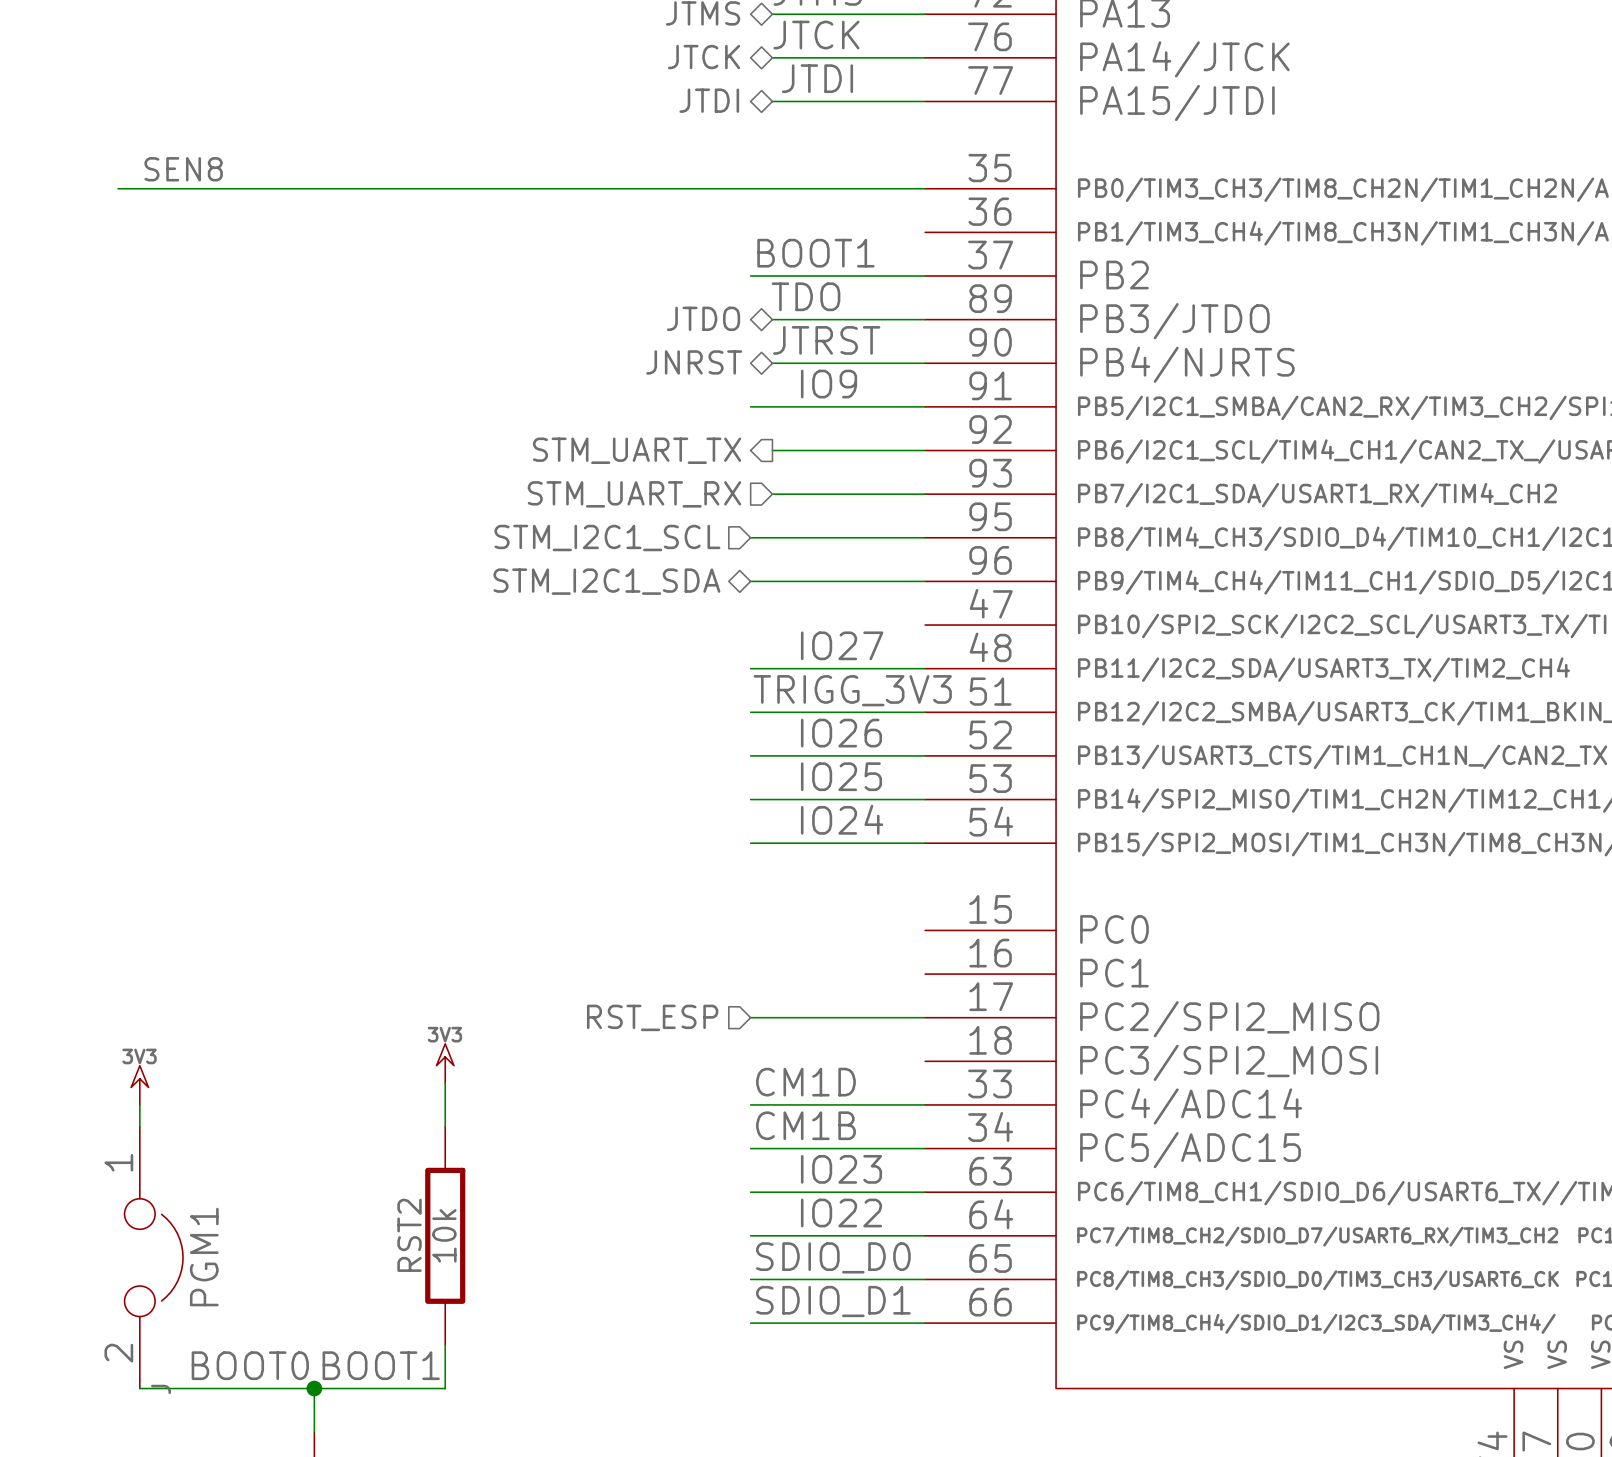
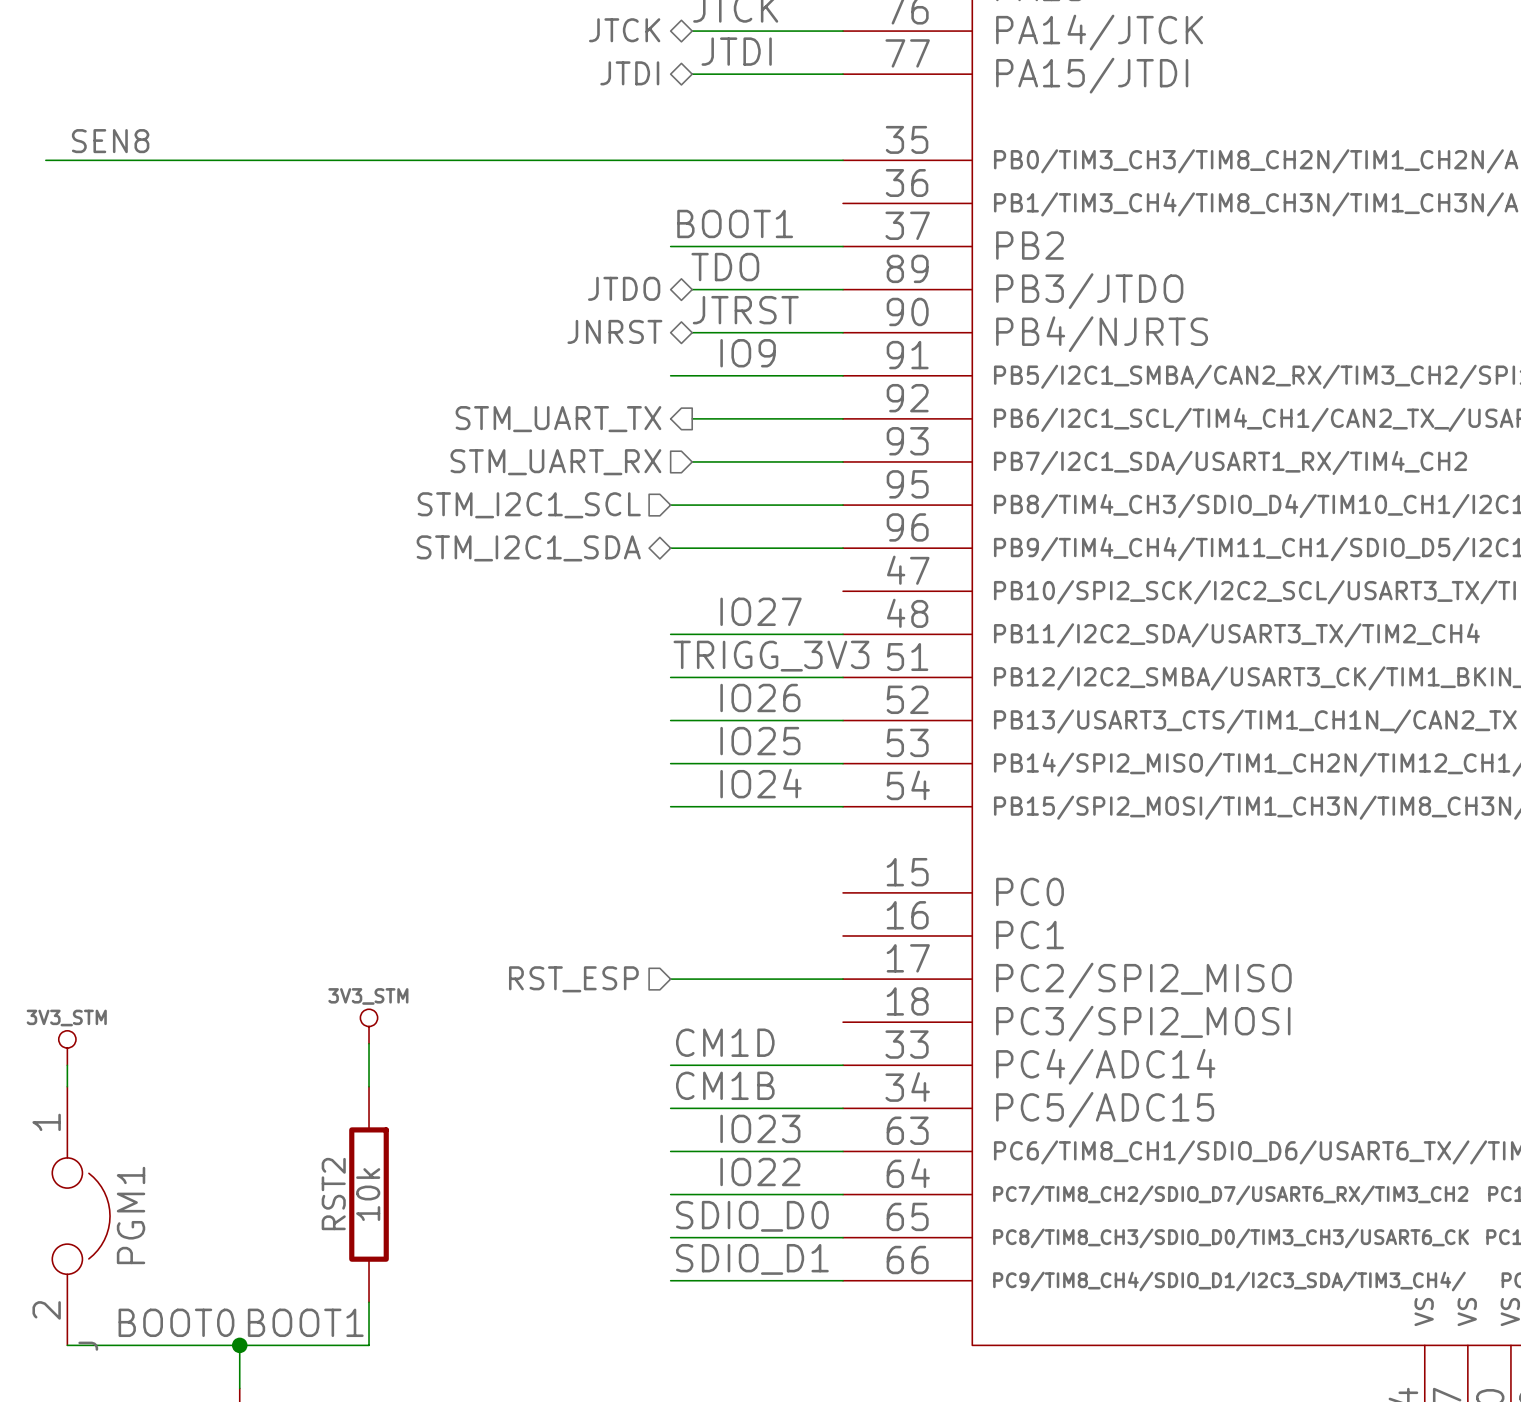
power symbol: 3V3 (445, 1063) -> 3V3_STM (369, 1026)
power symbol: 3V3 (139, 1085) -> 3V3_STM (67, 1048)

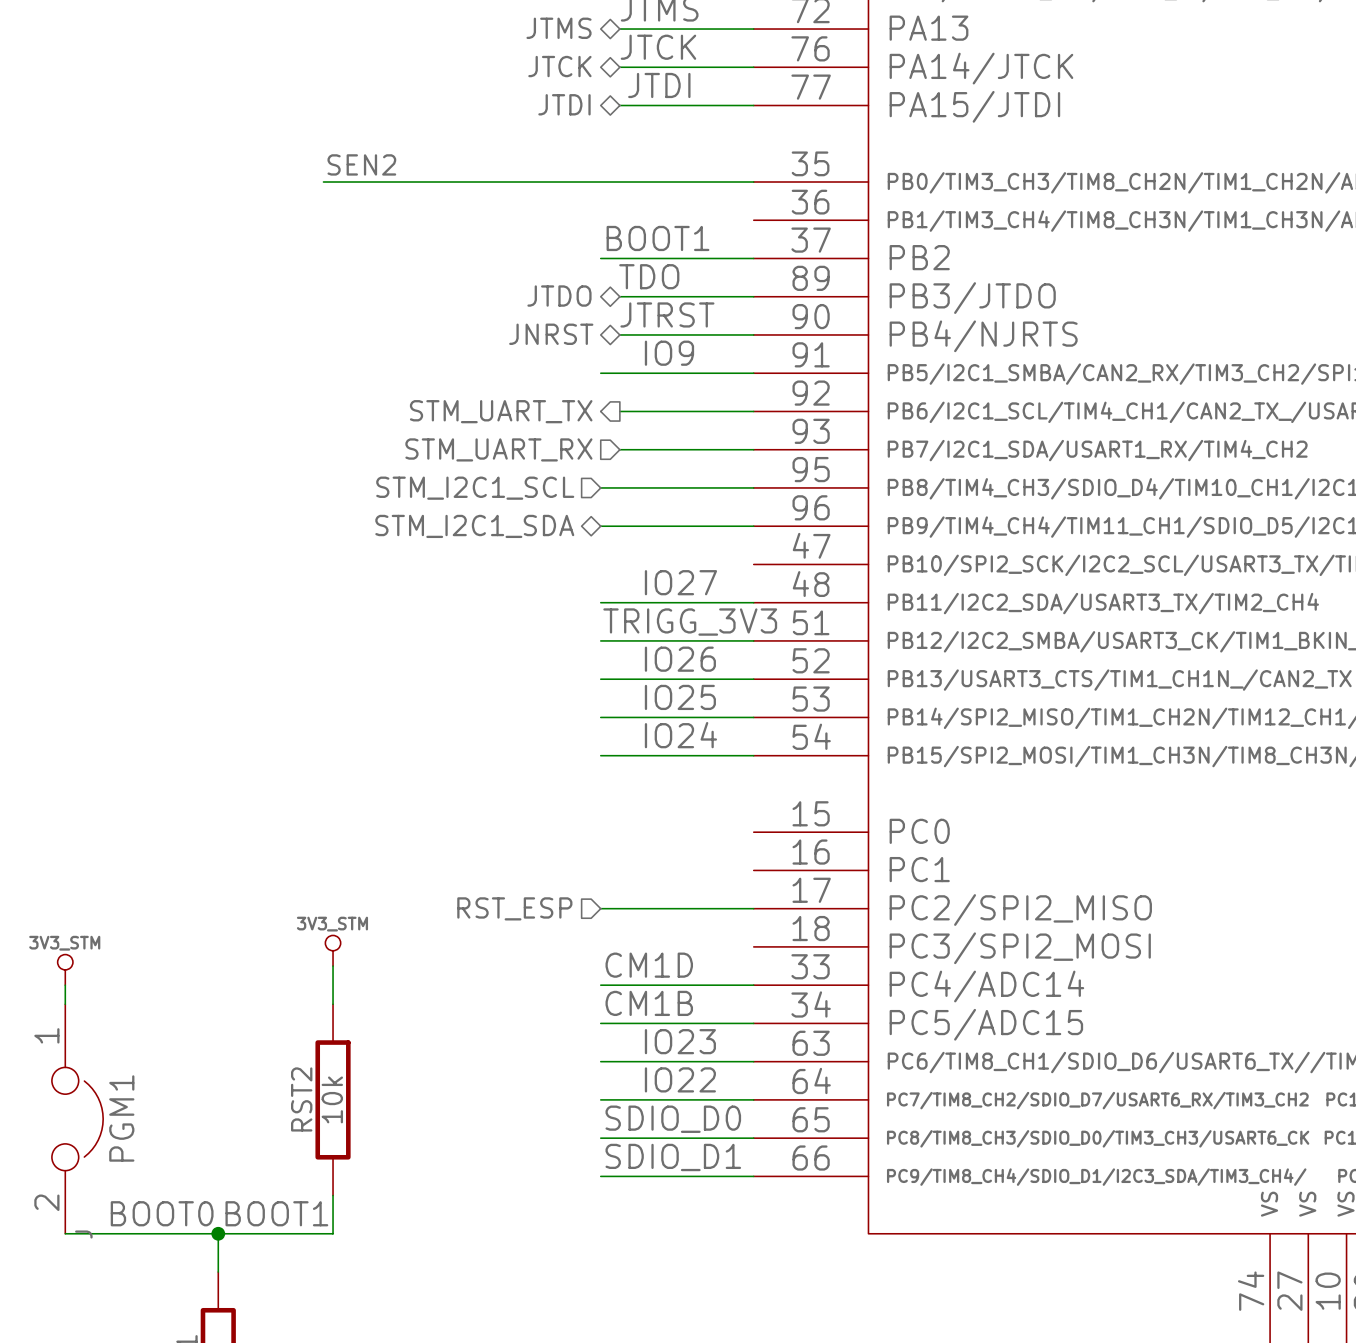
label: SEN8 (110, 141) -> none
label: none -> SEN2 (361, 164)
wire: (45, 160) (358, 160) -> none

